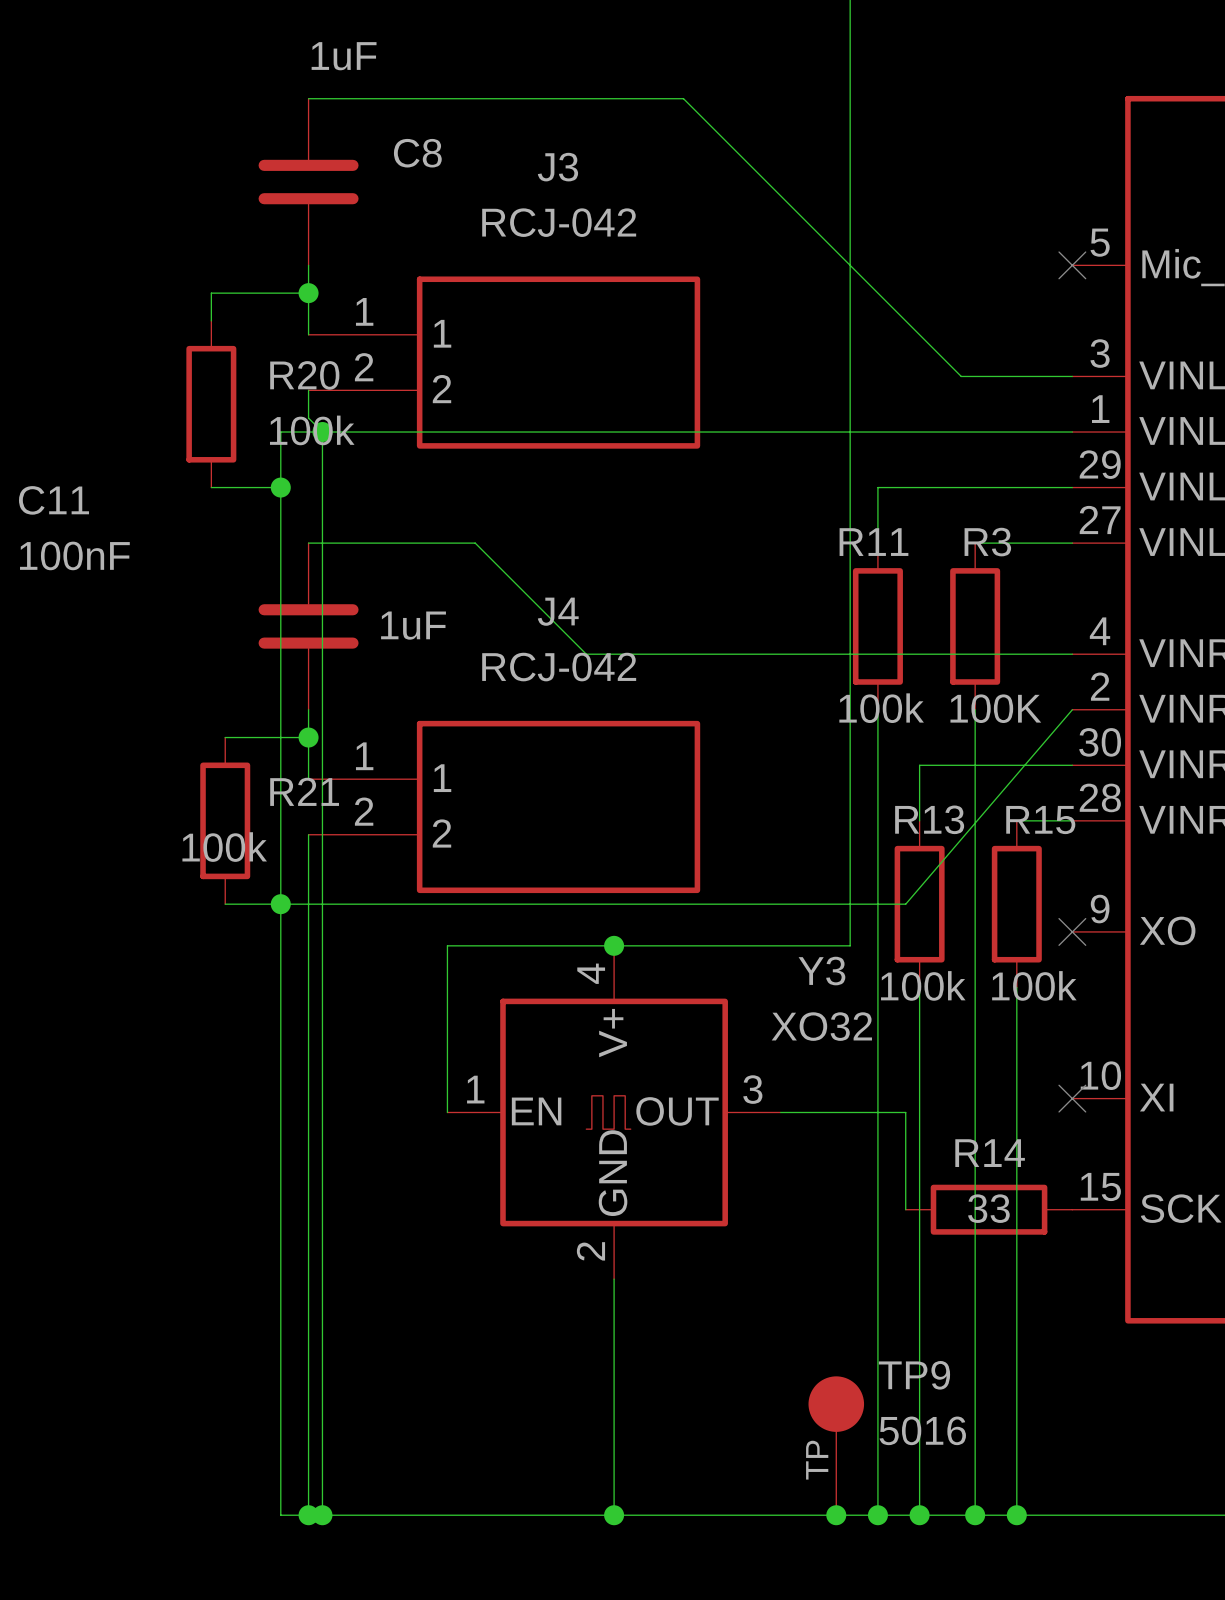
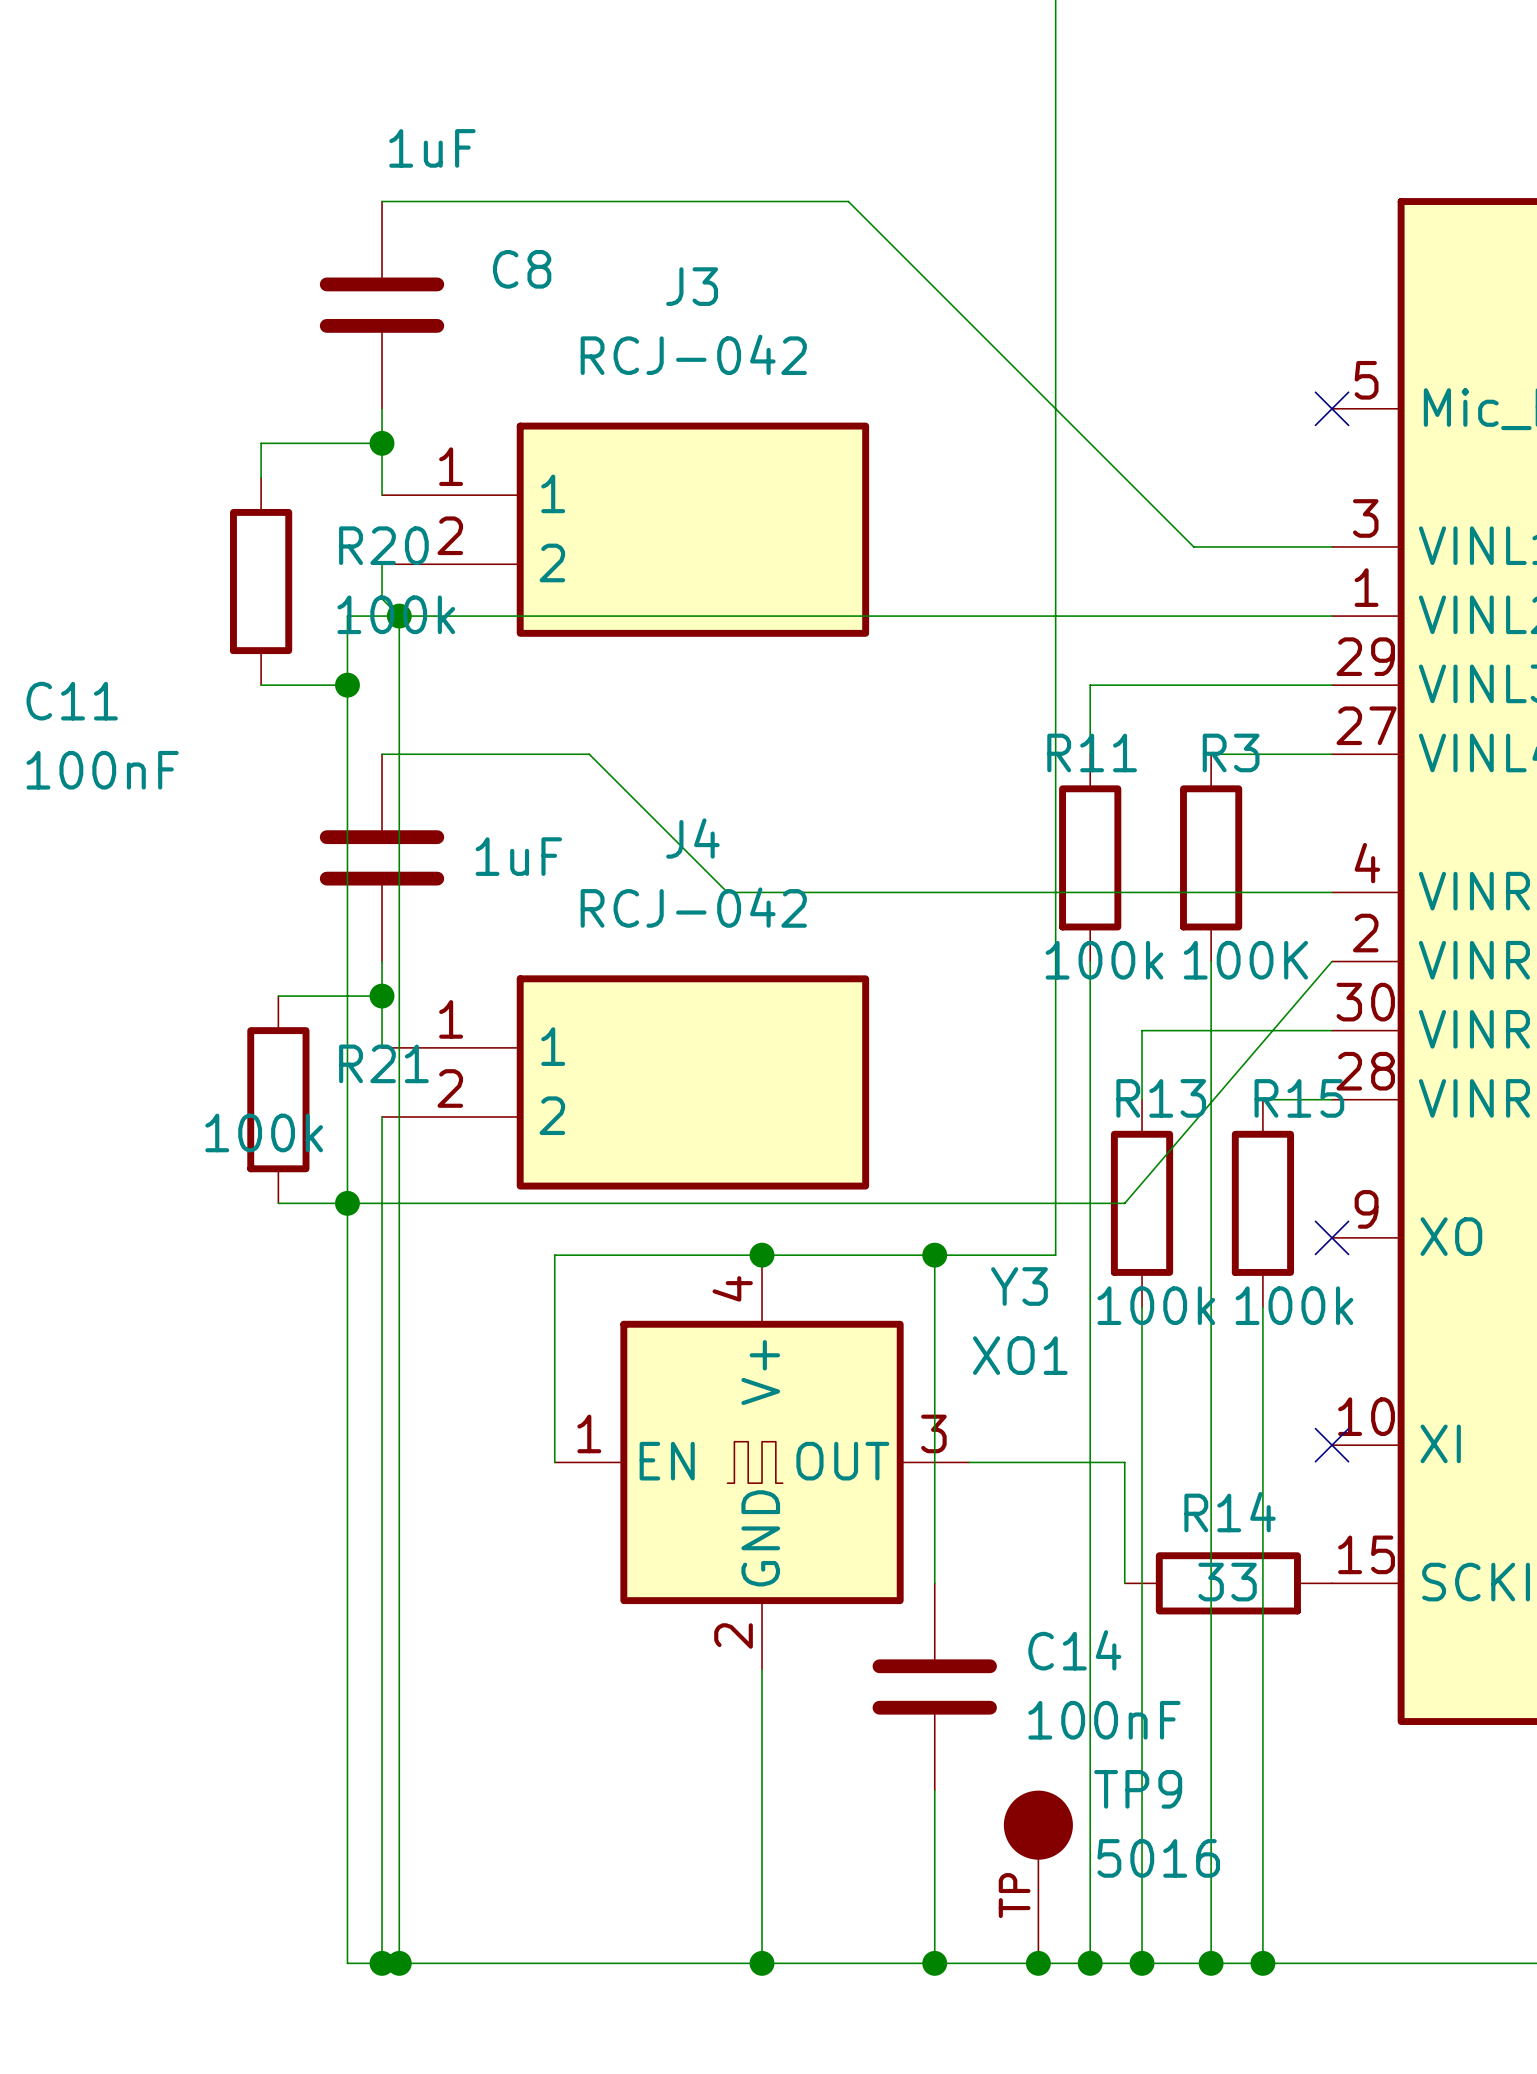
wire: none -> (934, 1255) (934, 1583)
junction: none -> (934, 1255)
Y3 value: XO32 (821, 1026) -> XO1 (1020, 1355)
C14: none -> 100nF (934, 1686)
wire: none -> (934, 1790) (934, 1963)
junction: none -> (934, 1963)

